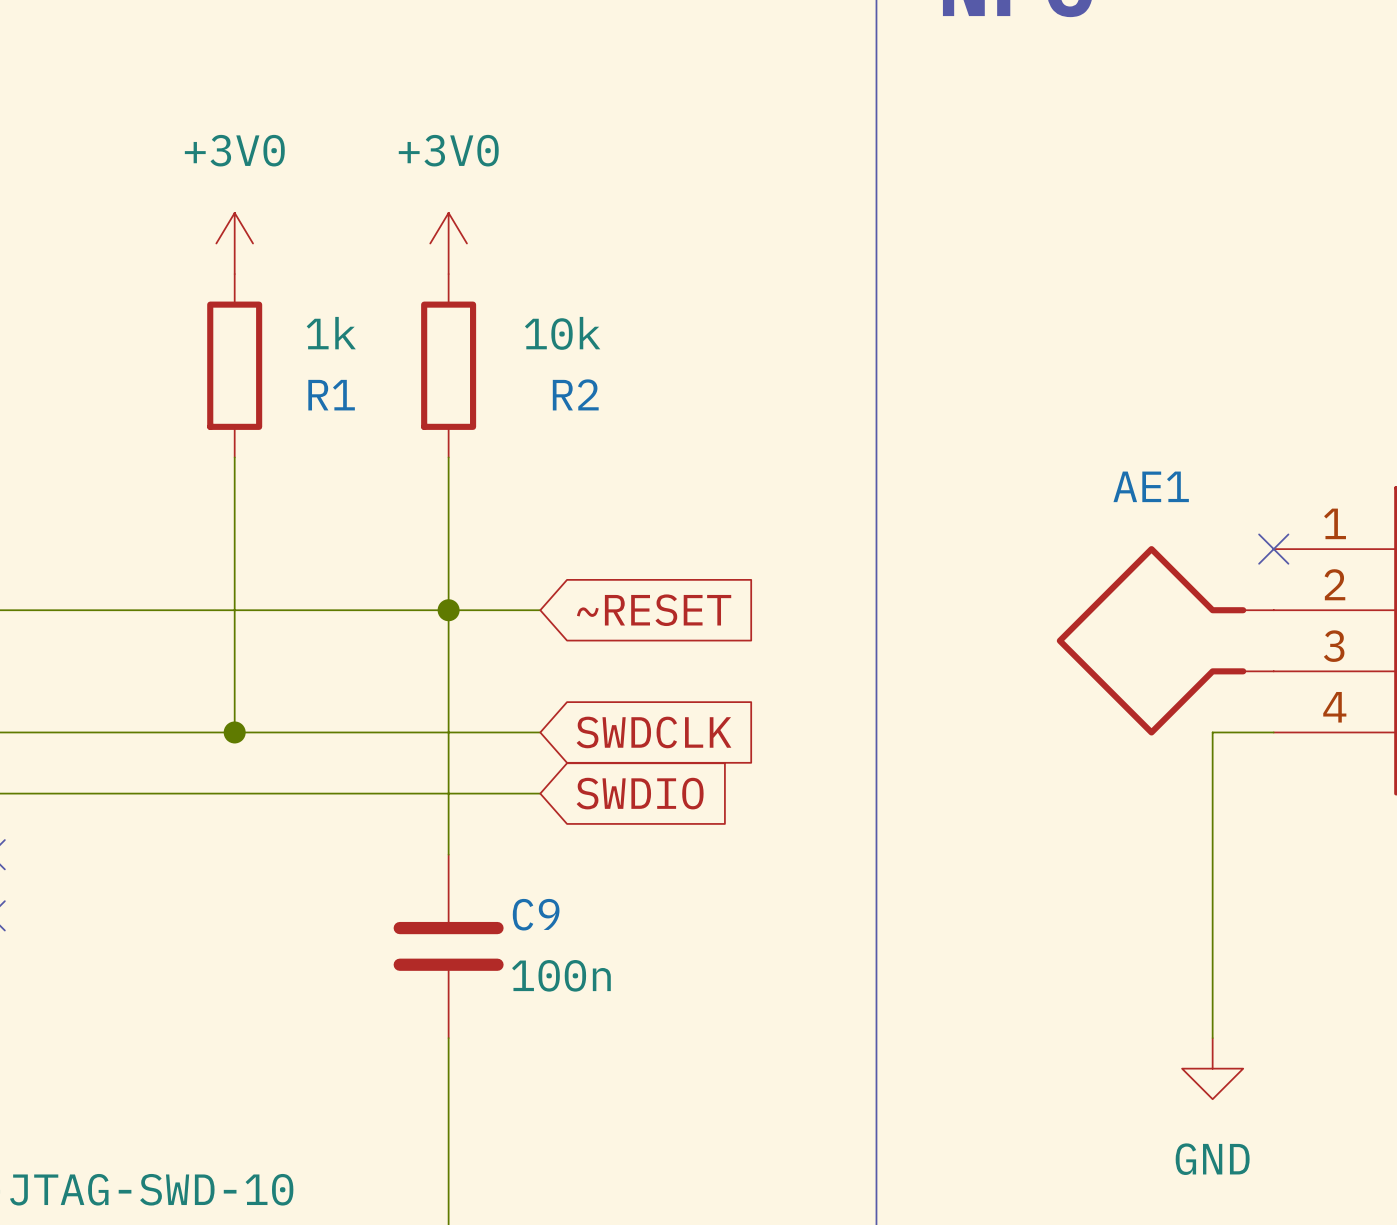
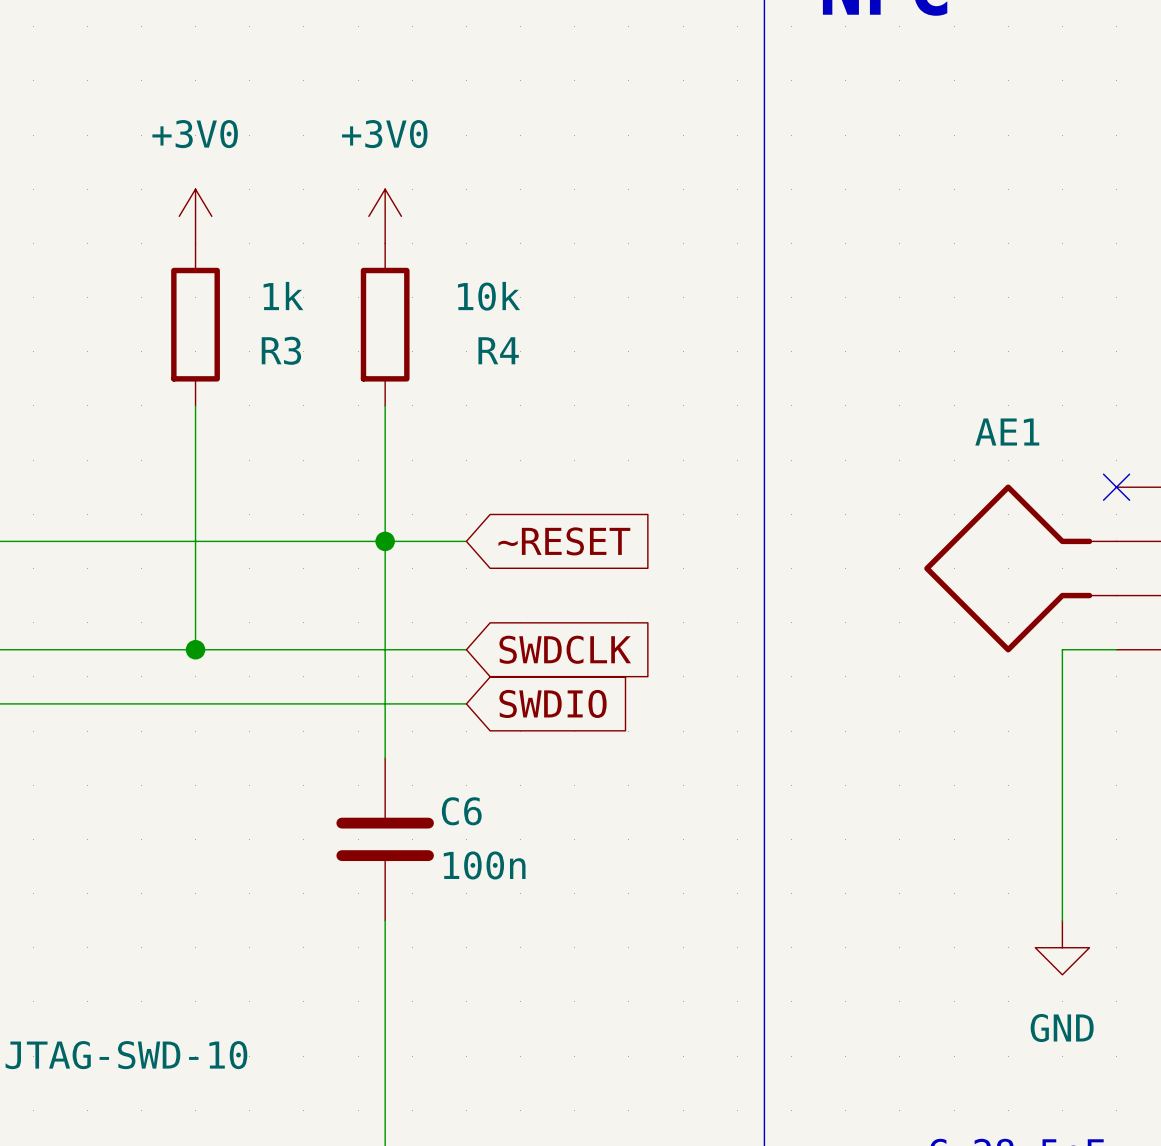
R2 name: R2 (575, 394) -> R4 (498, 350)
R1 name: R1 (331, 395) -> R3 (281, 350)
C9 name: C9 (536, 914) -> C6 (461, 811)

